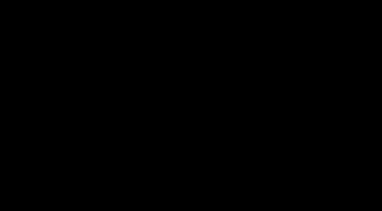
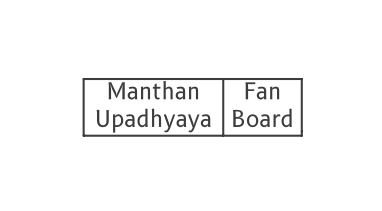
line: none -> (83, 79) (83, 135) (301, 135) (301, 79) (83, 79)
line: none -> (223, 79) (223, 135)
text: none -> Manthan (153, 90)
text: none -> Fan (262, 90)
text: none -> Board (262, 117)
text: none -> Upadhyaya (153, 120)

